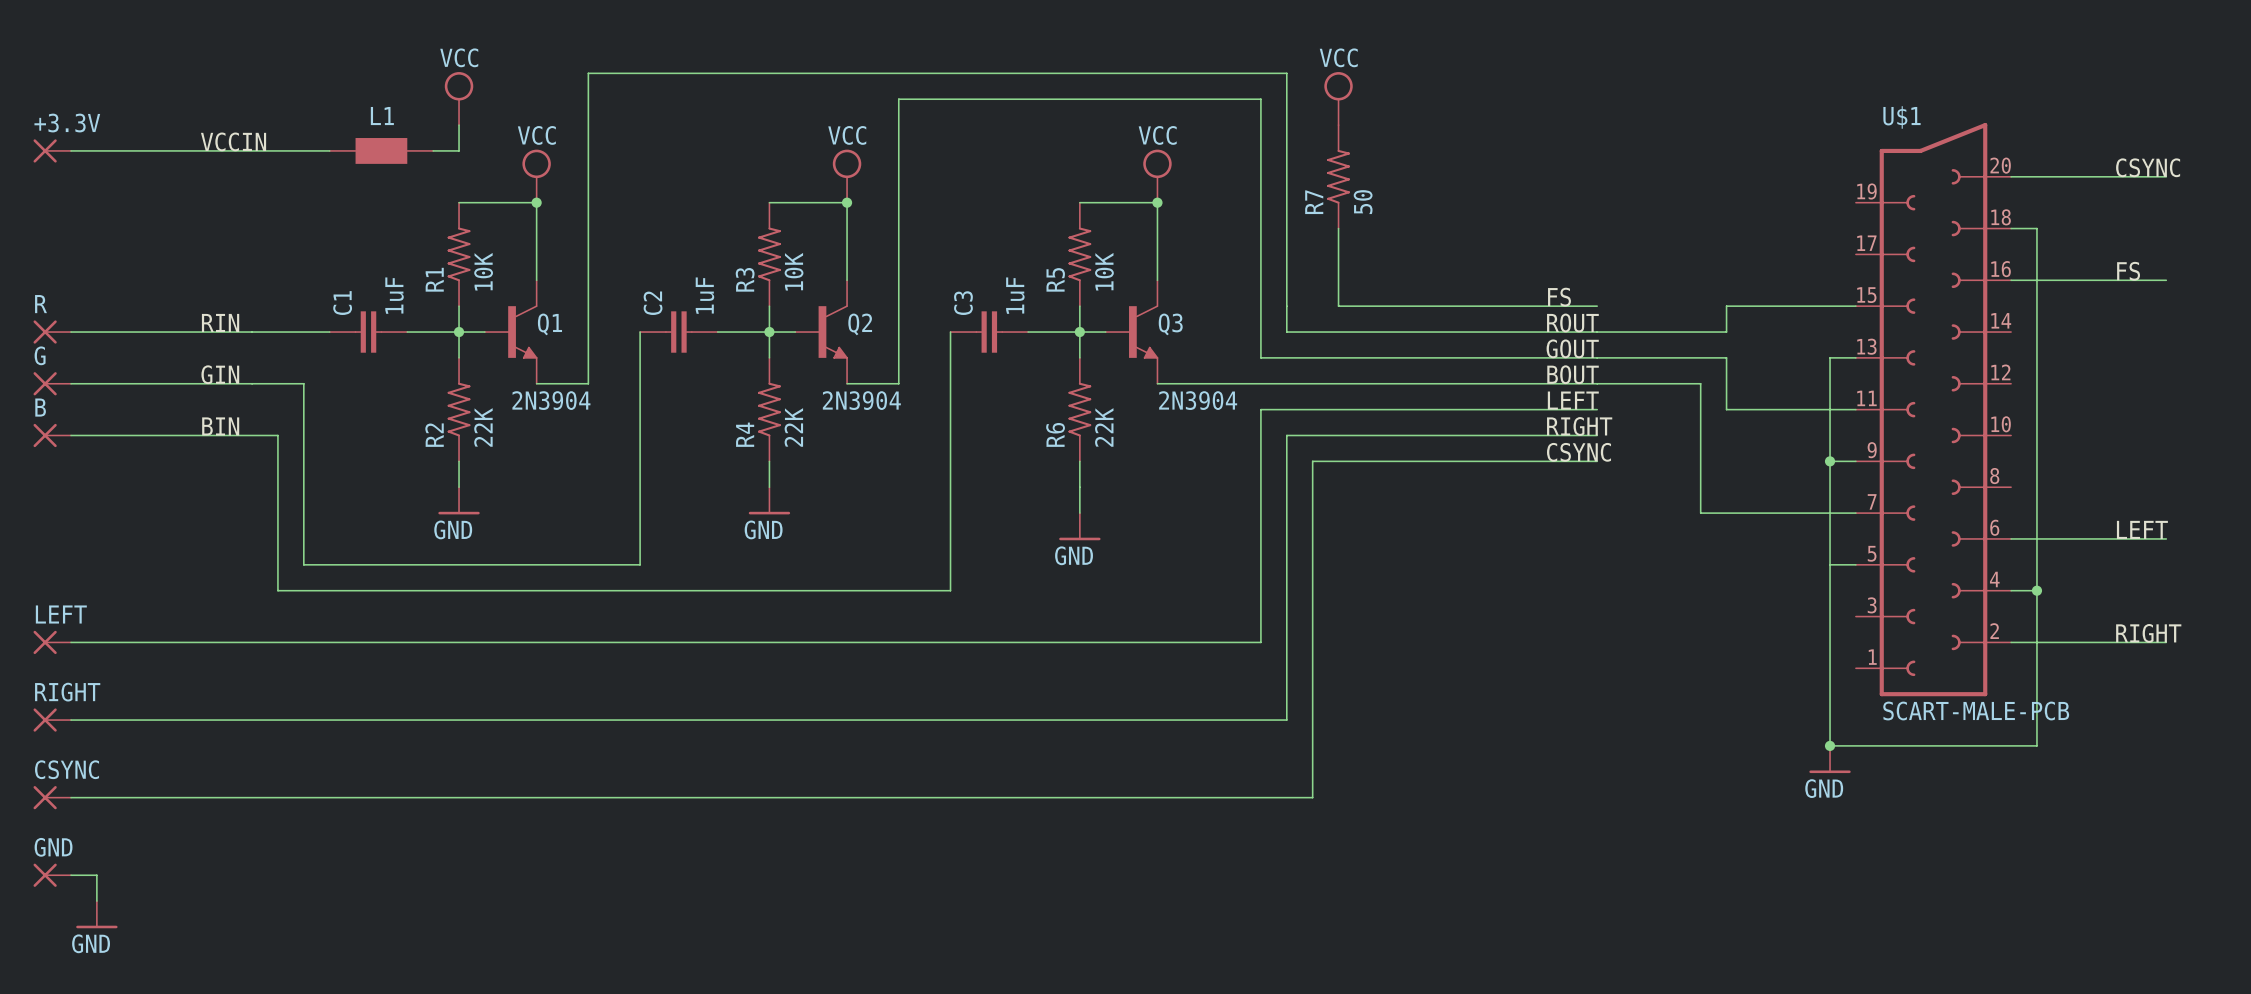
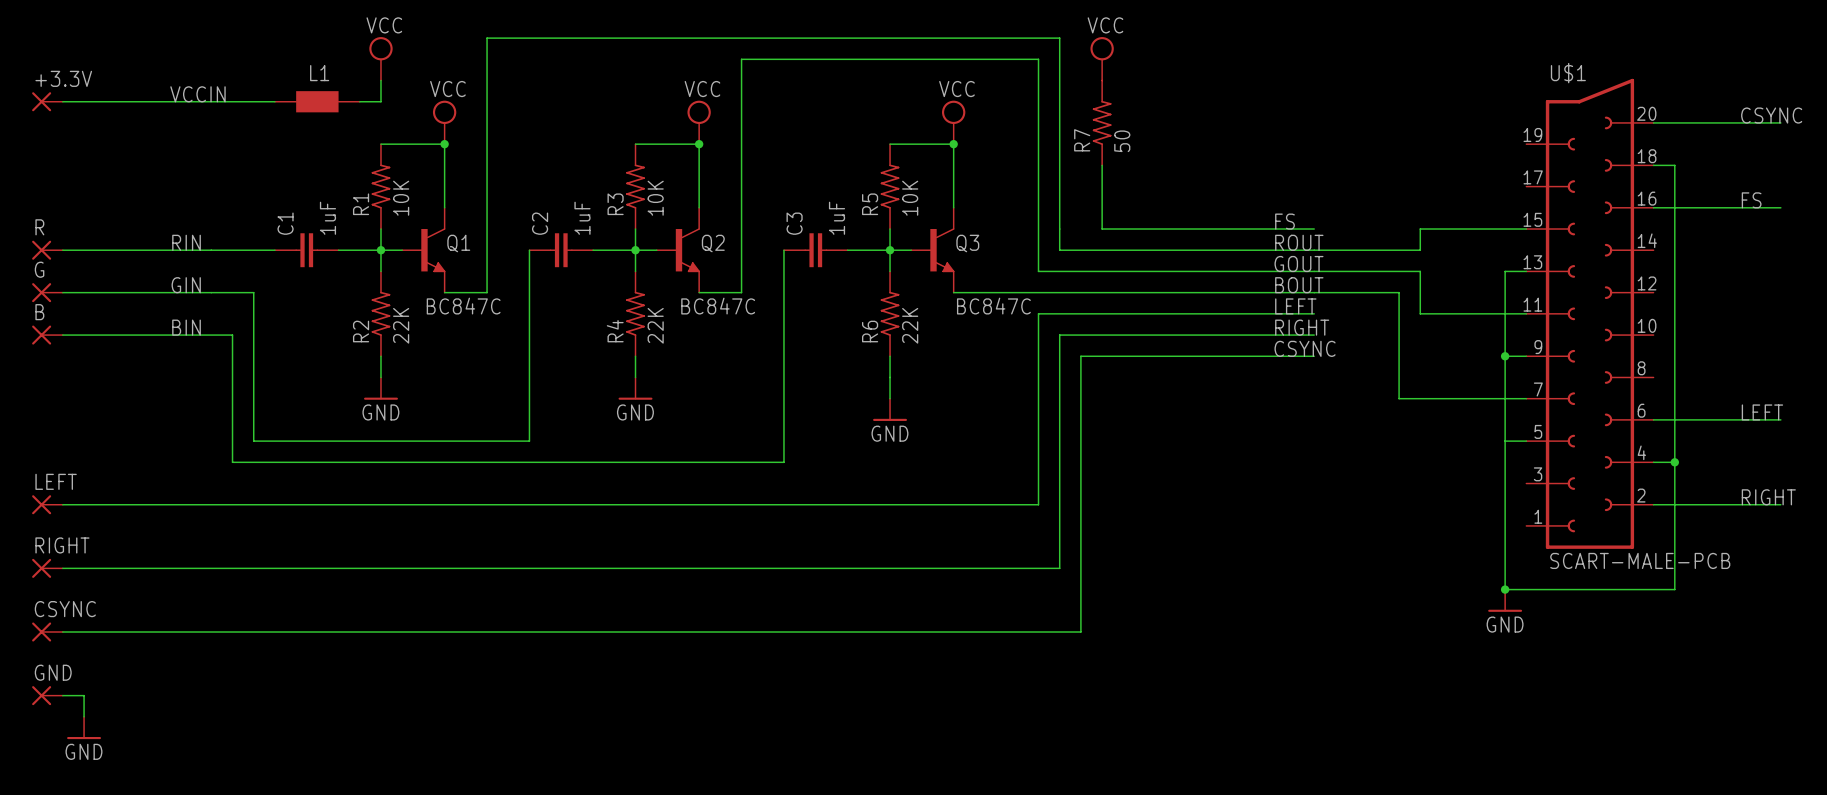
Q1 value: 2N3904 (551, 400) -> BC847C (463, 306)
Q2 value: 2N3904 (861, 400) -> BC847C (718, 306)
Q3 value: 2N3904 (1198, 400) -> BC847C (993, 306)

